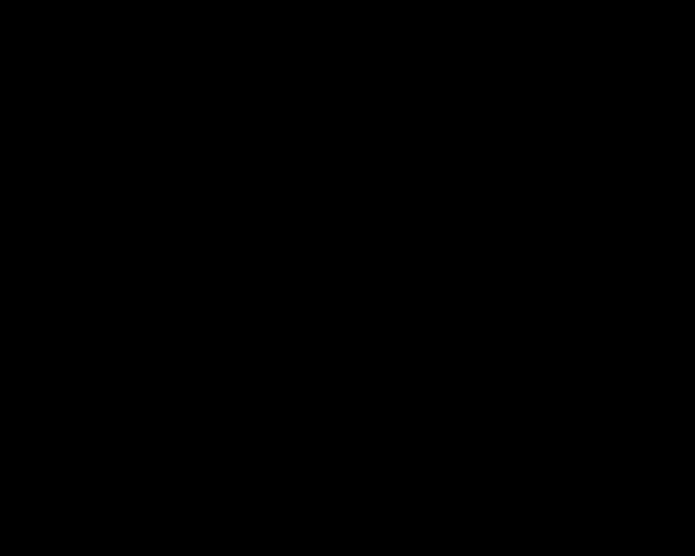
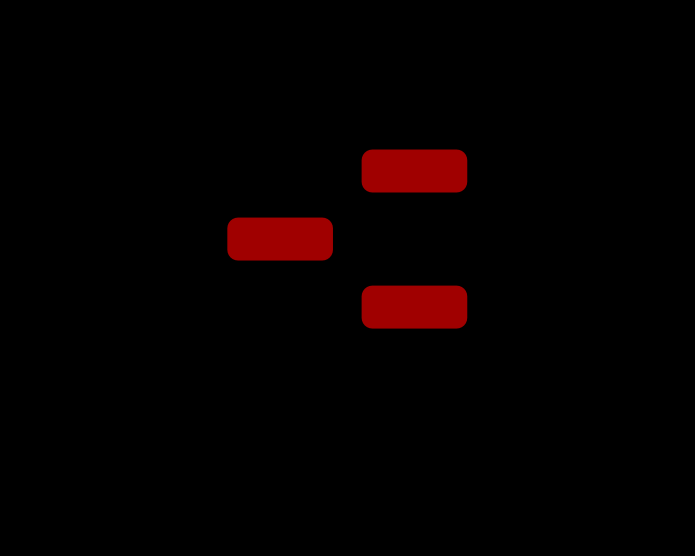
part: none -> (347, 239)

